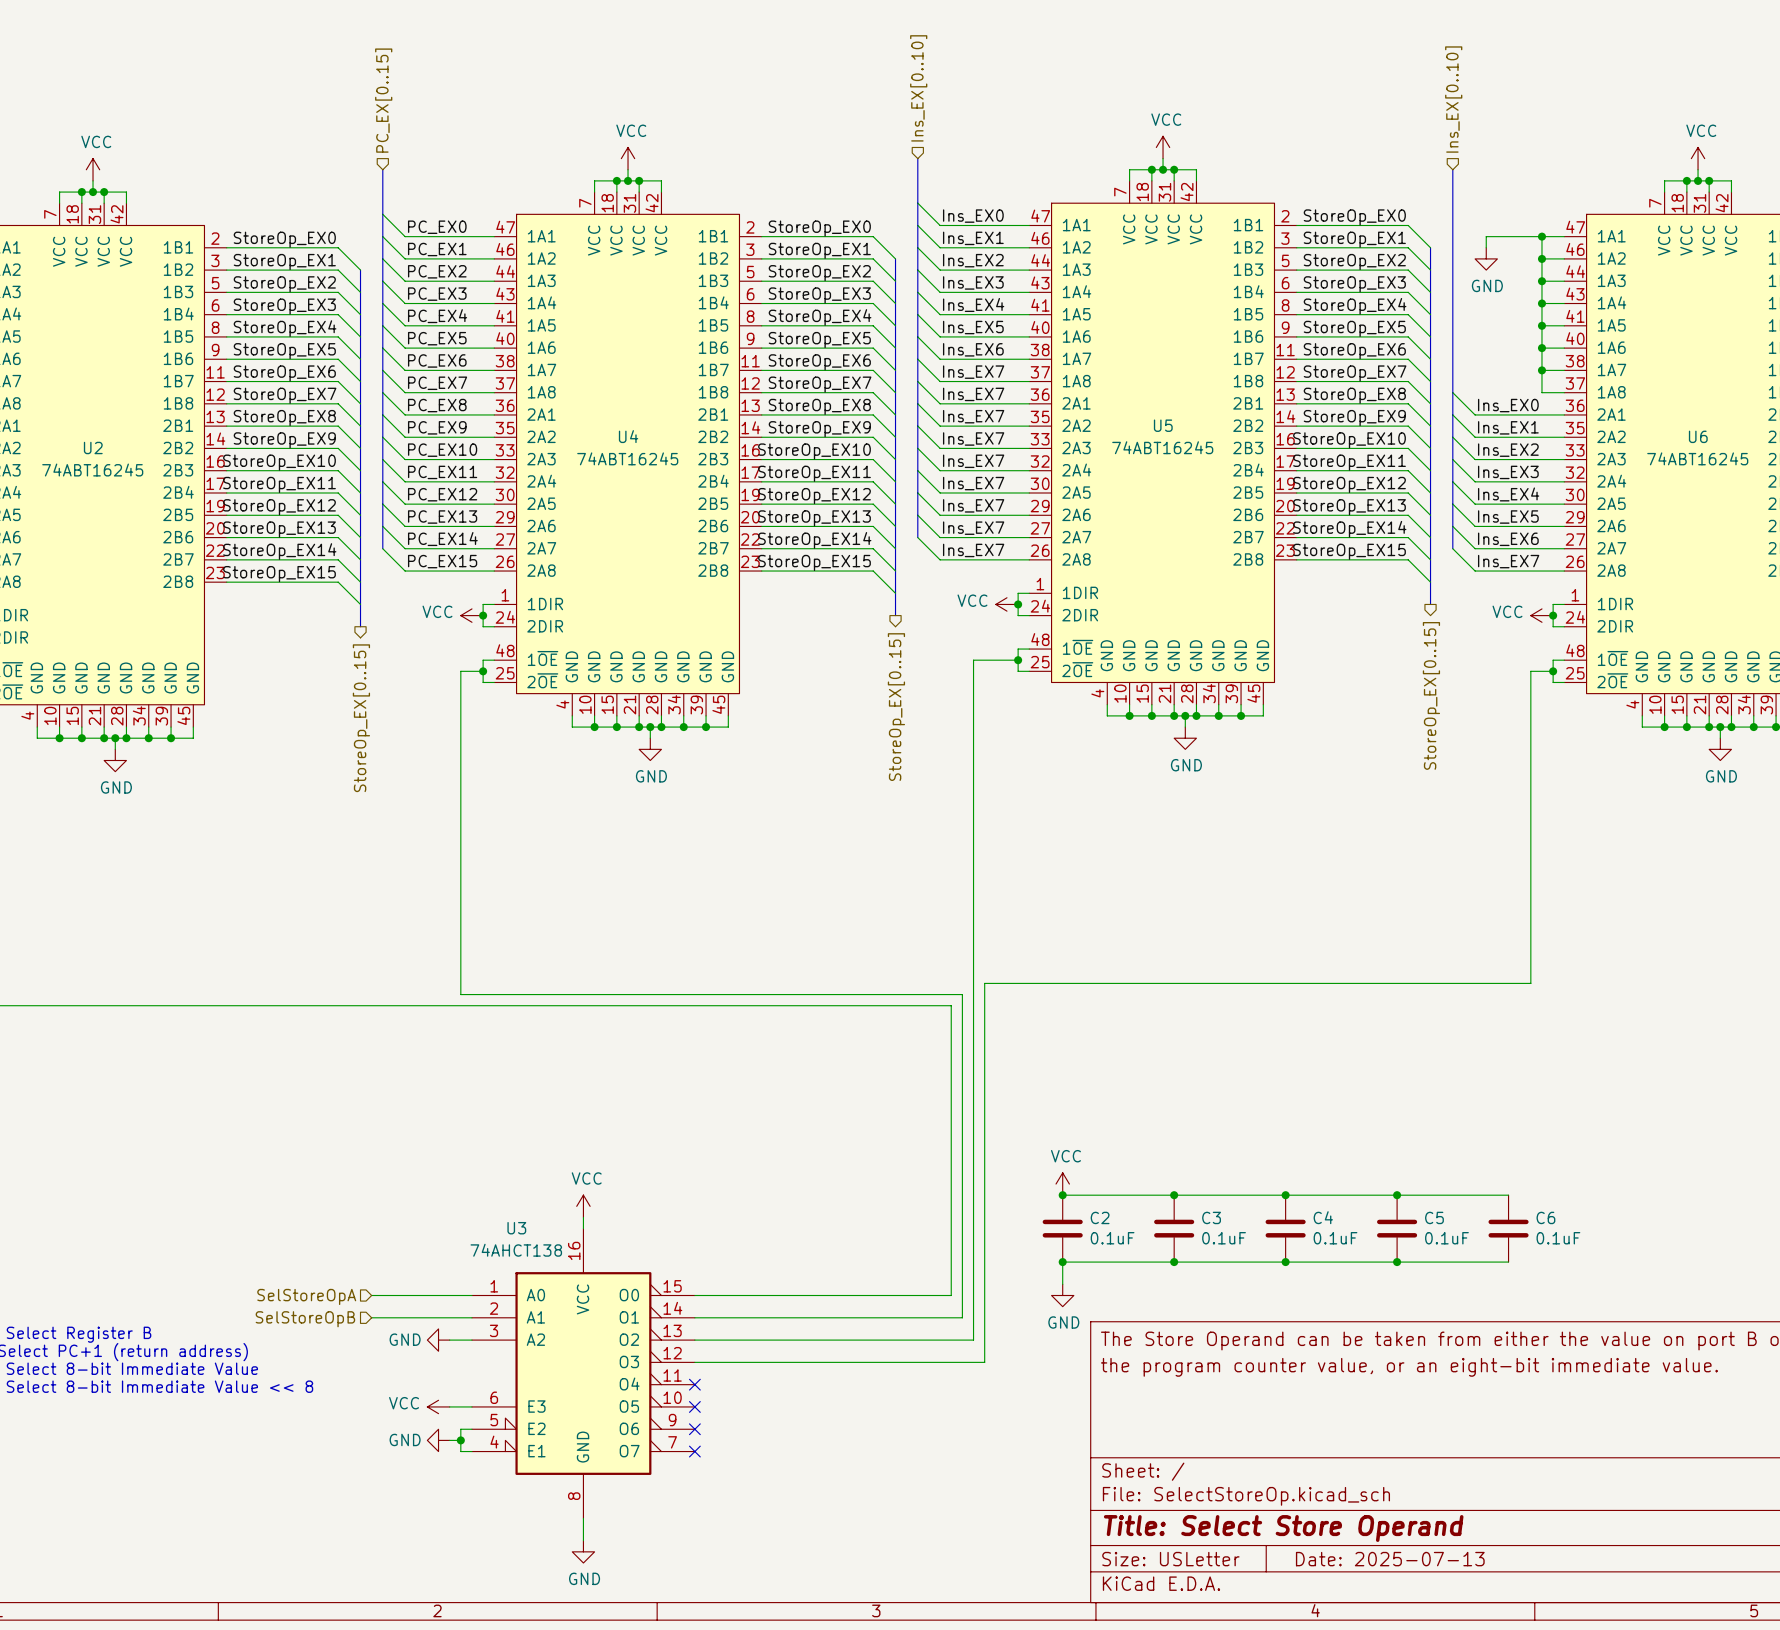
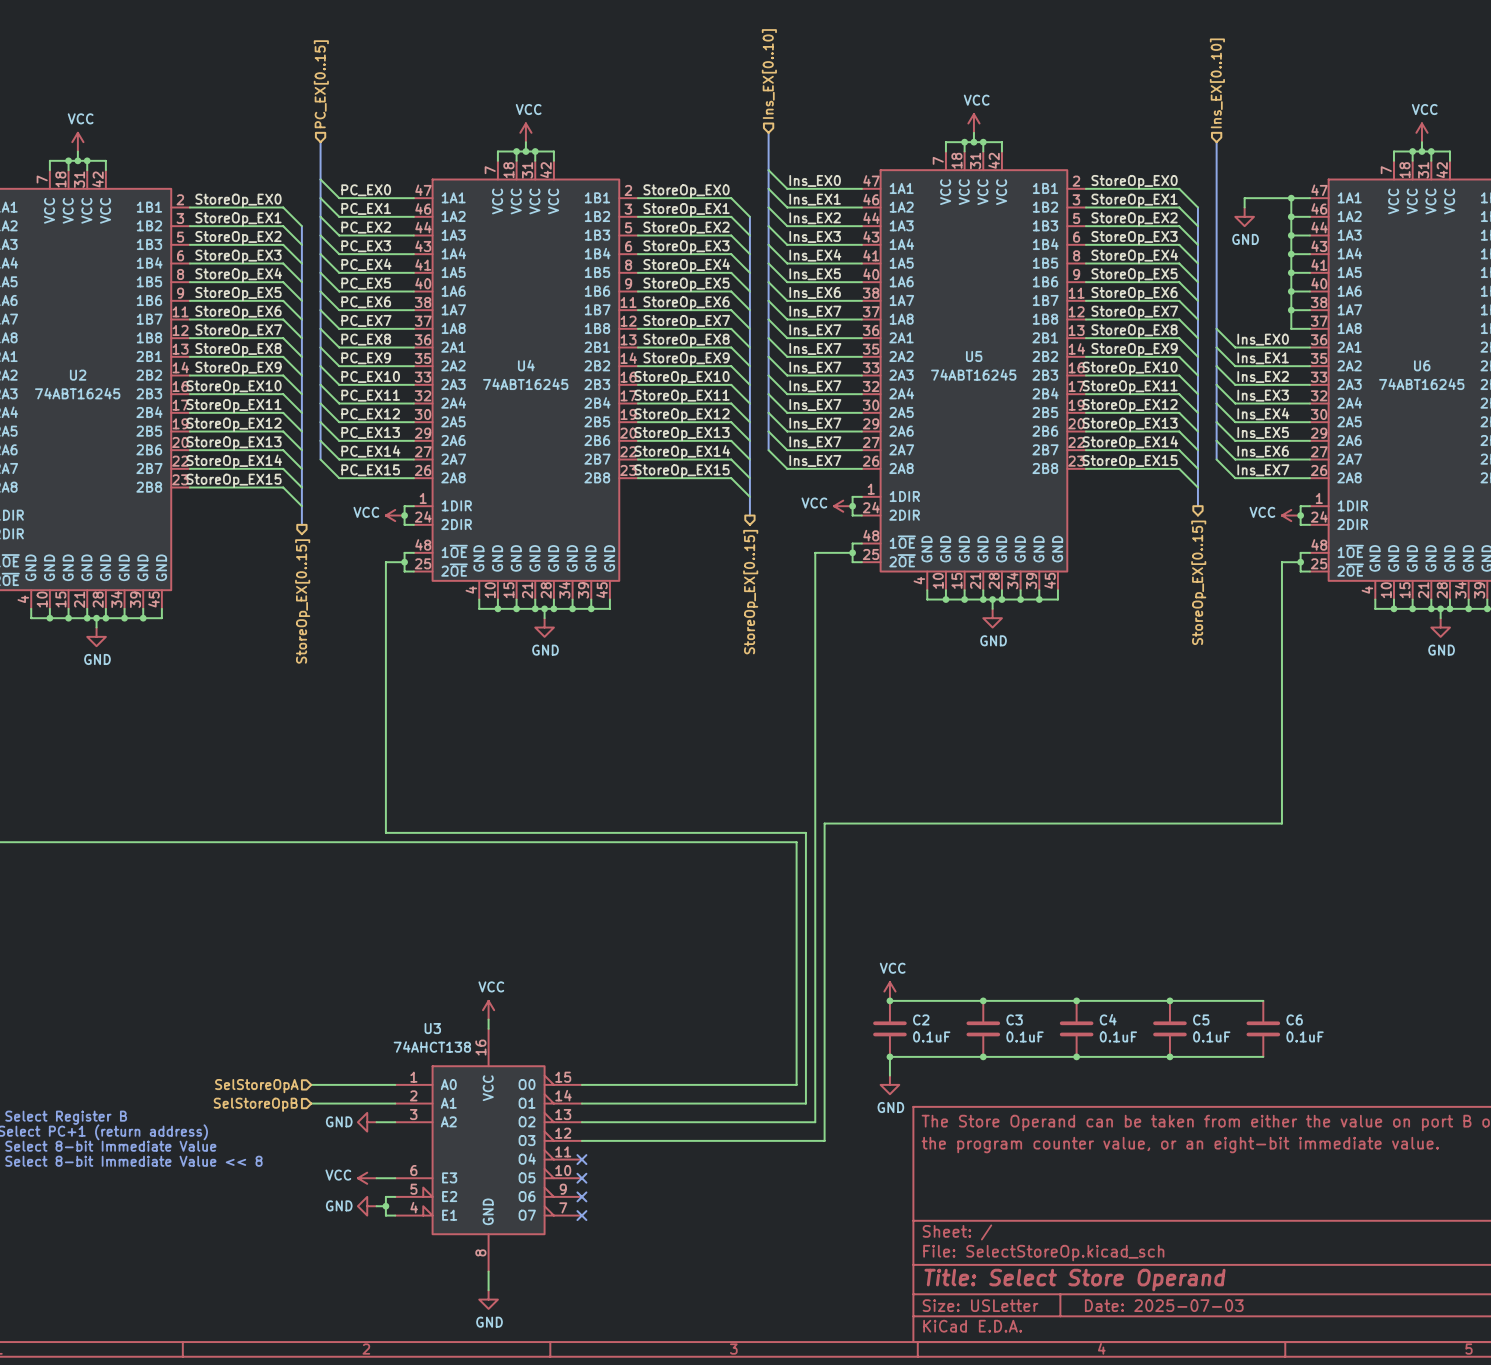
title block: Date: 2025-07-13 (1390, 1559) -> Date: 2025-07-03 (1164, 1305)

